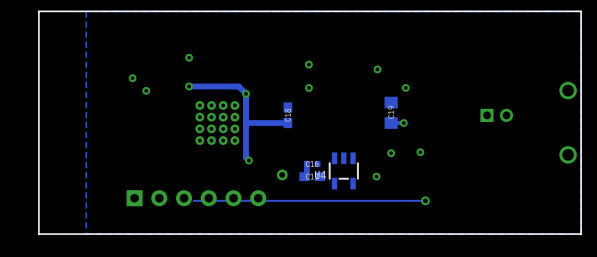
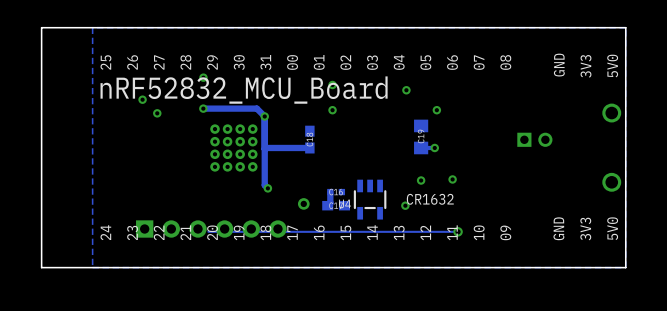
text: none -> 25 (105, 62)
text: none -> 26 (132, 62)
text: none -> 27 (159, 62)
text: none -> 28 (185, 62)
text: none -> 29 (212, 62)
text: none -> 30 (239, 62)
text: none -> 31 (265, 62)
text: none -> 00 (292, 62)
text: none -> 01 (319, 62)
text: none -> 02 (345, 62)
text: none -> 03 (372, 62)
text: none -> 04 (399, 62)
text: none -> 05 (425, 62)
text: none -> 06 (452, 62)
text: none -> 07 (479, 62)
text: none -> 08 (505, 62)
text: none -> GND (559, 65)
text: none -> 5V0 (612, 66)
text: none -> 3V3 (585, 66)
text: none -> nRF52832_MCU_Board (244, 90)
text: none -> CR1632 (430, 199)
text: none -> 5V0 (612, 228)
text: none -> GND (558, 228)
text: none -> 3V3 (585, 229)
text: none -> 24 (105, 232)
text: none -> 23 (132, 232)
text: none -> 22 (159, 232)
text: none -> 21 (185, 232)
text: none -> 20 (212, 232)
text: none -> 19 (239, 232)
text: none -> 18 (265, 232)
text: none -> 17 (292, 232)
text: none -> 16 (319, 232)
text: none -> 15 (345, 232)
text: none -> 14 (372, 232)
text: none -> 13 (399, 233)
text: none -> 12 (425, 232)
text: none -> 11 (452, 232)
text: none -> 10 (479, 232)
text: none -> 09 (505, 232)

